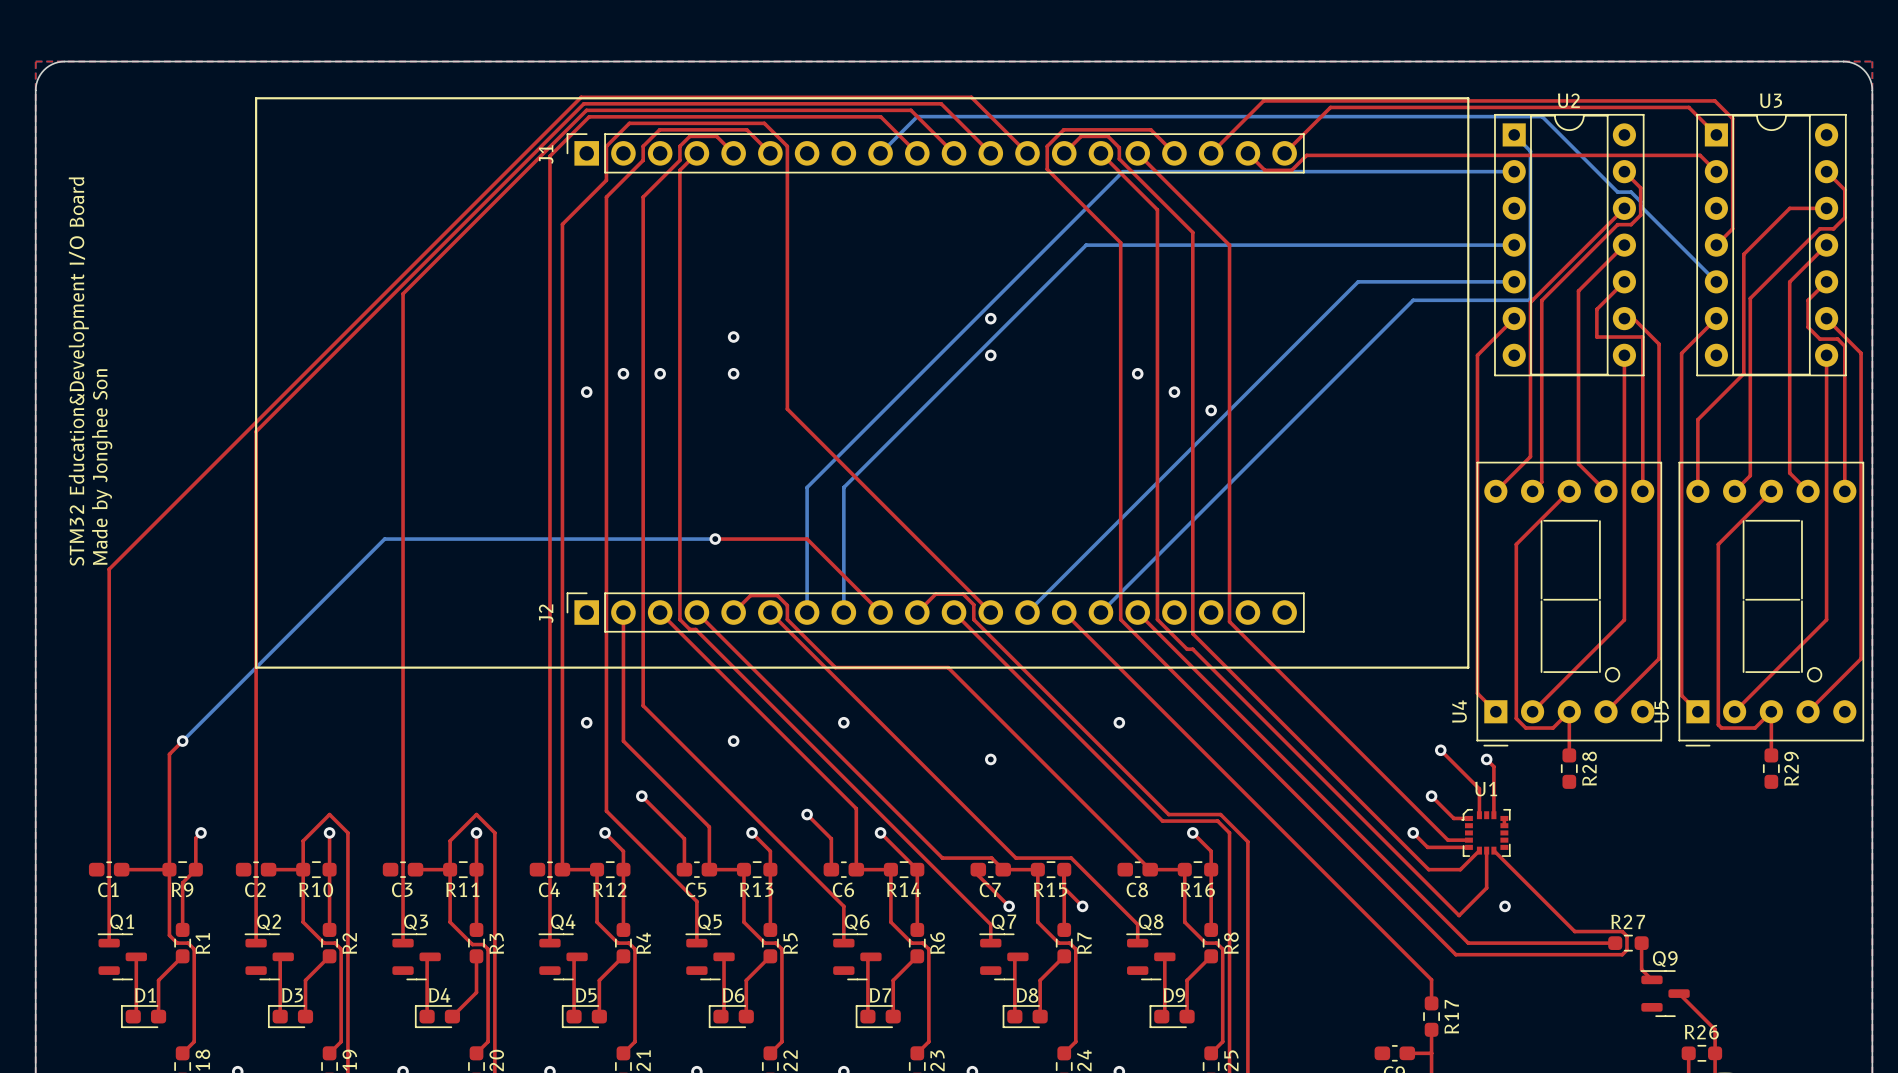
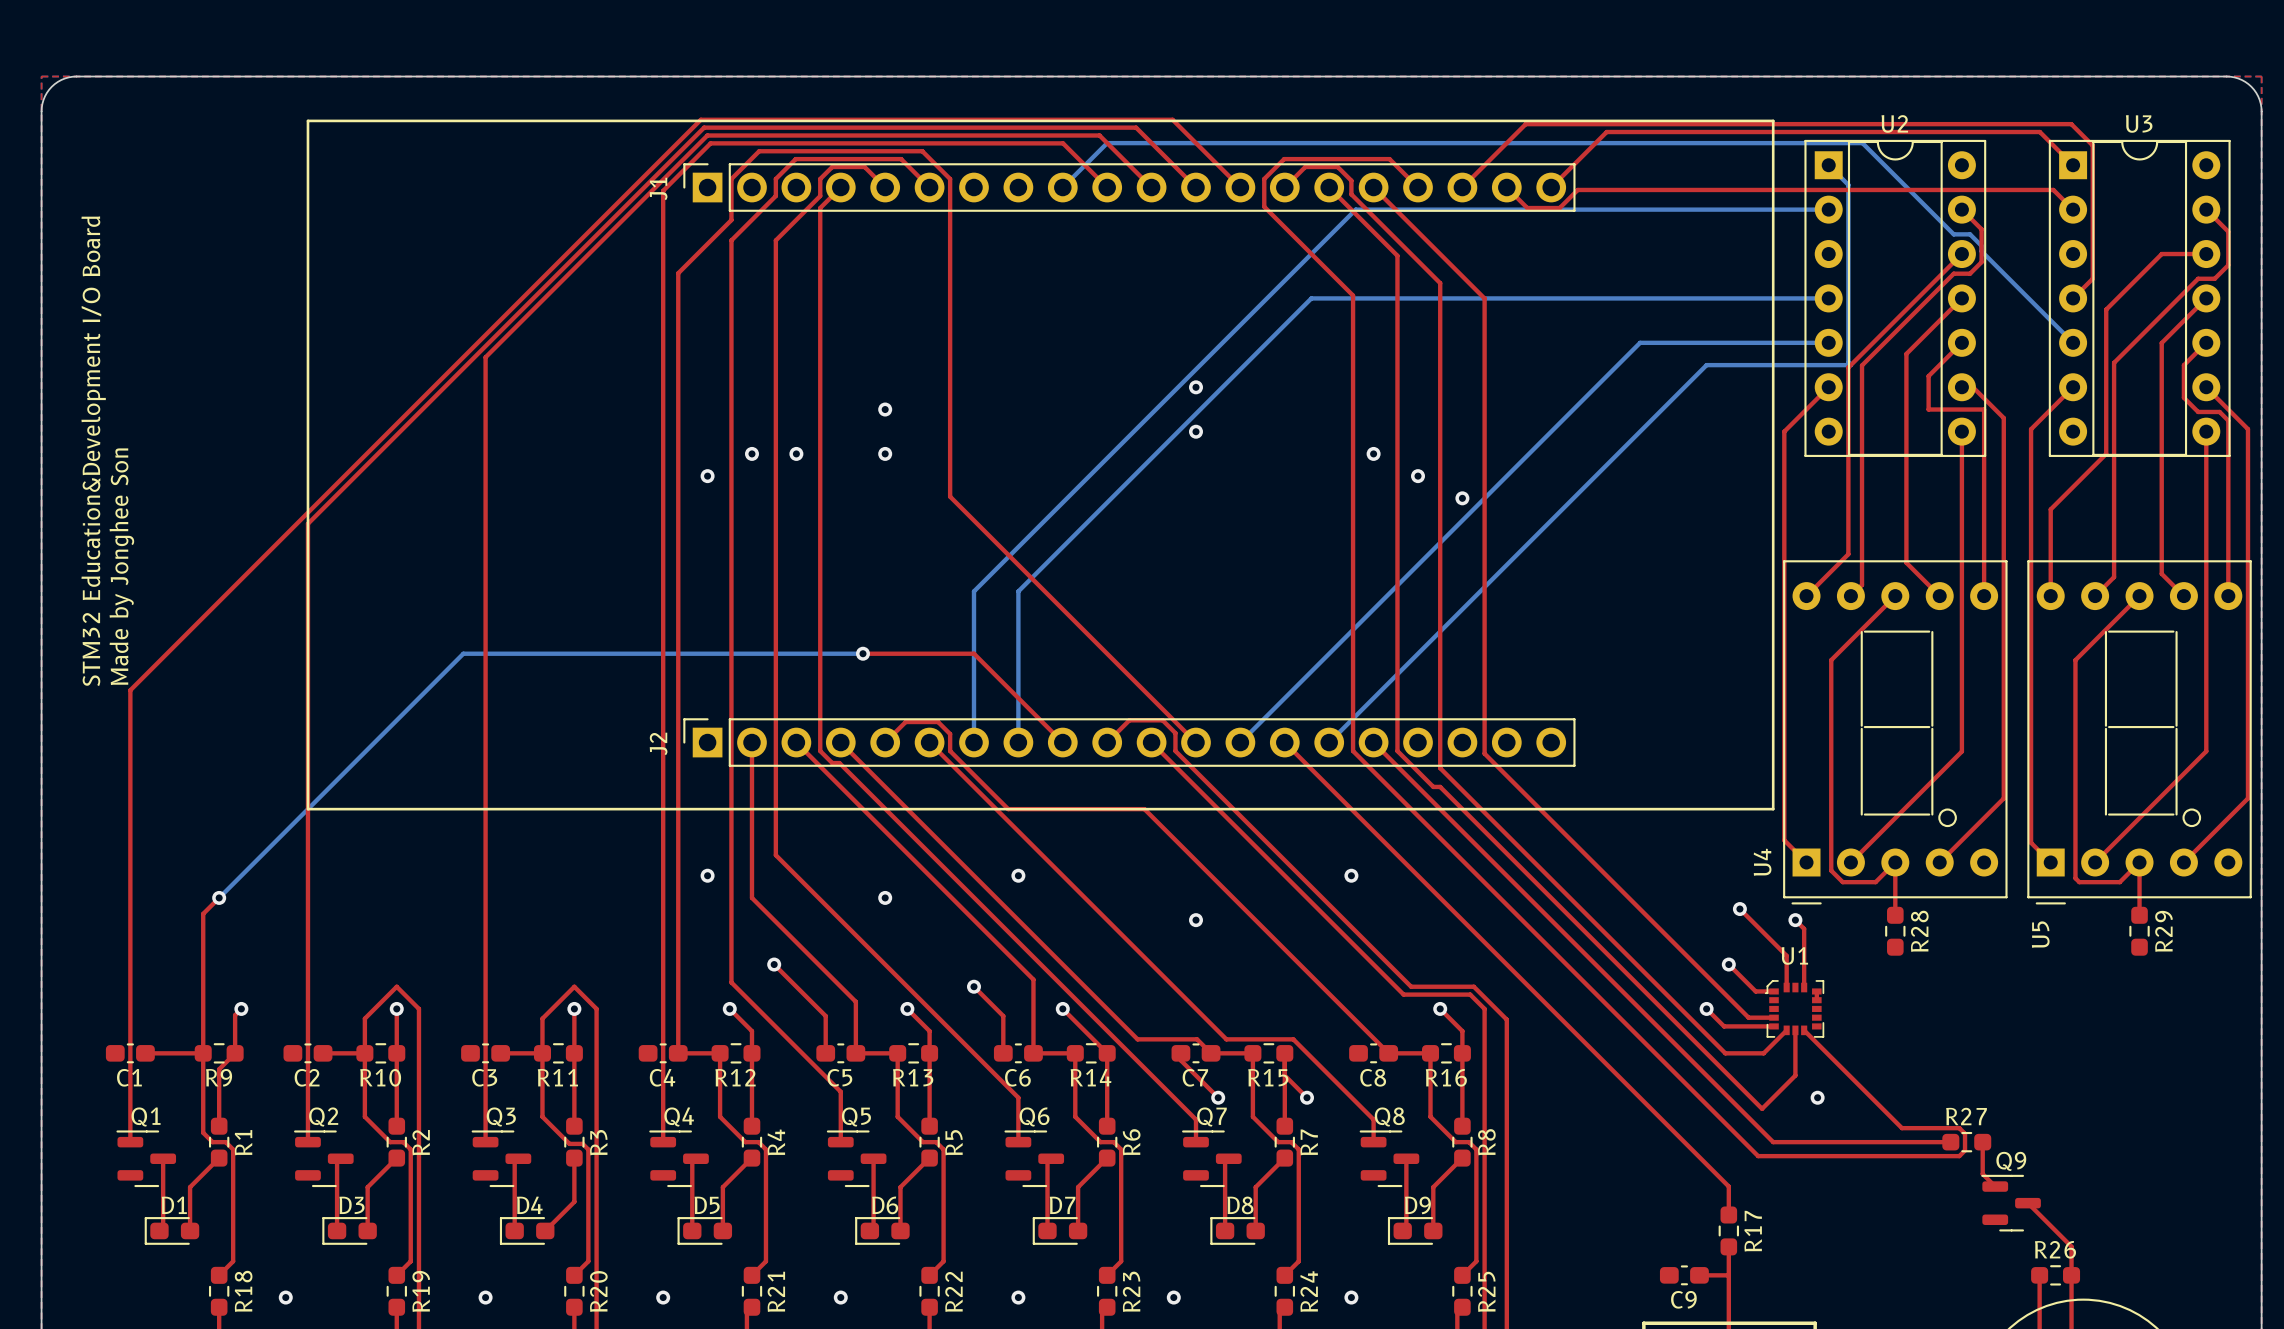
U5 name position: U5 (1661, 711) -> U5 (2040, 934)

